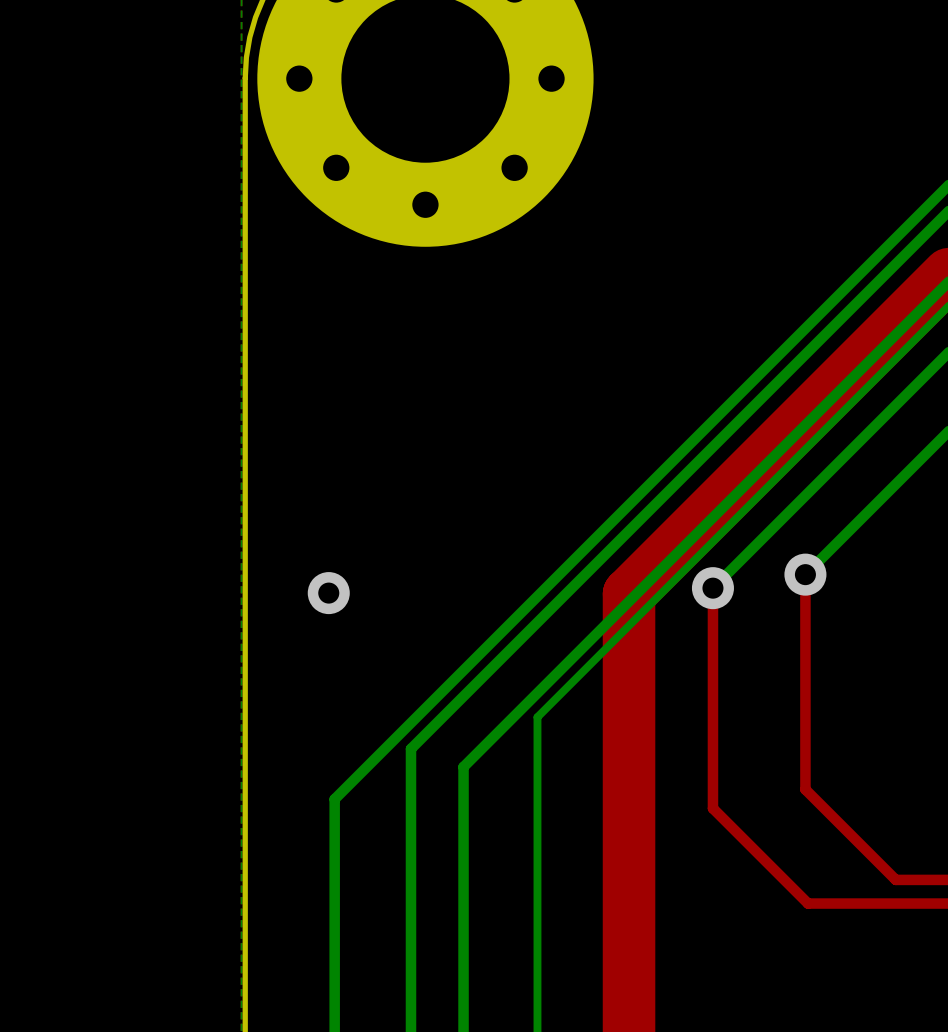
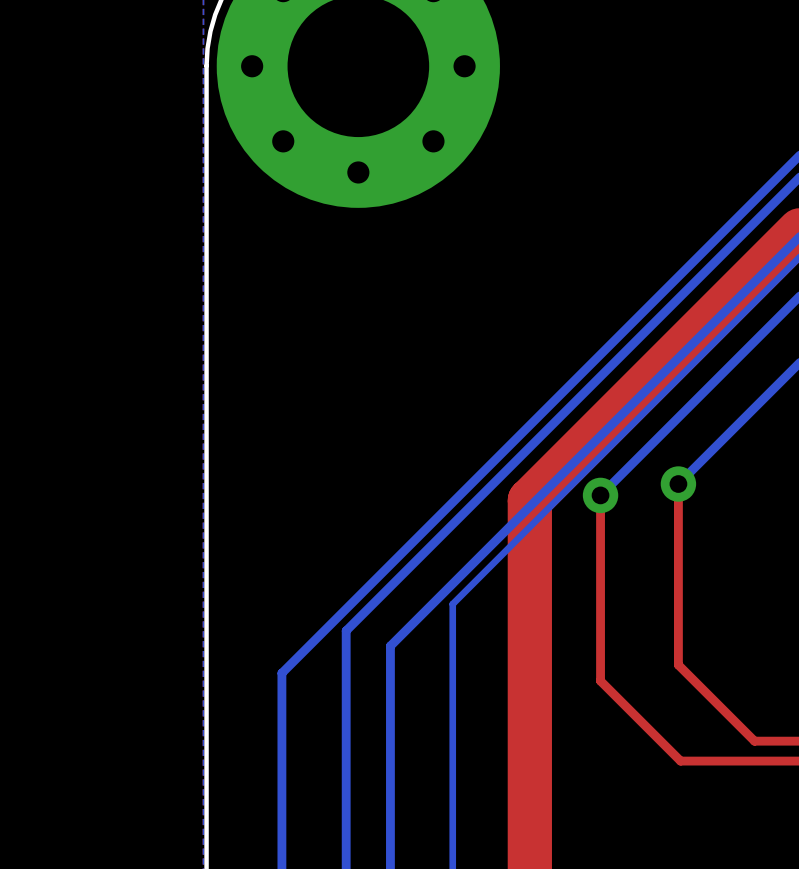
via: (328, 593) -> none

